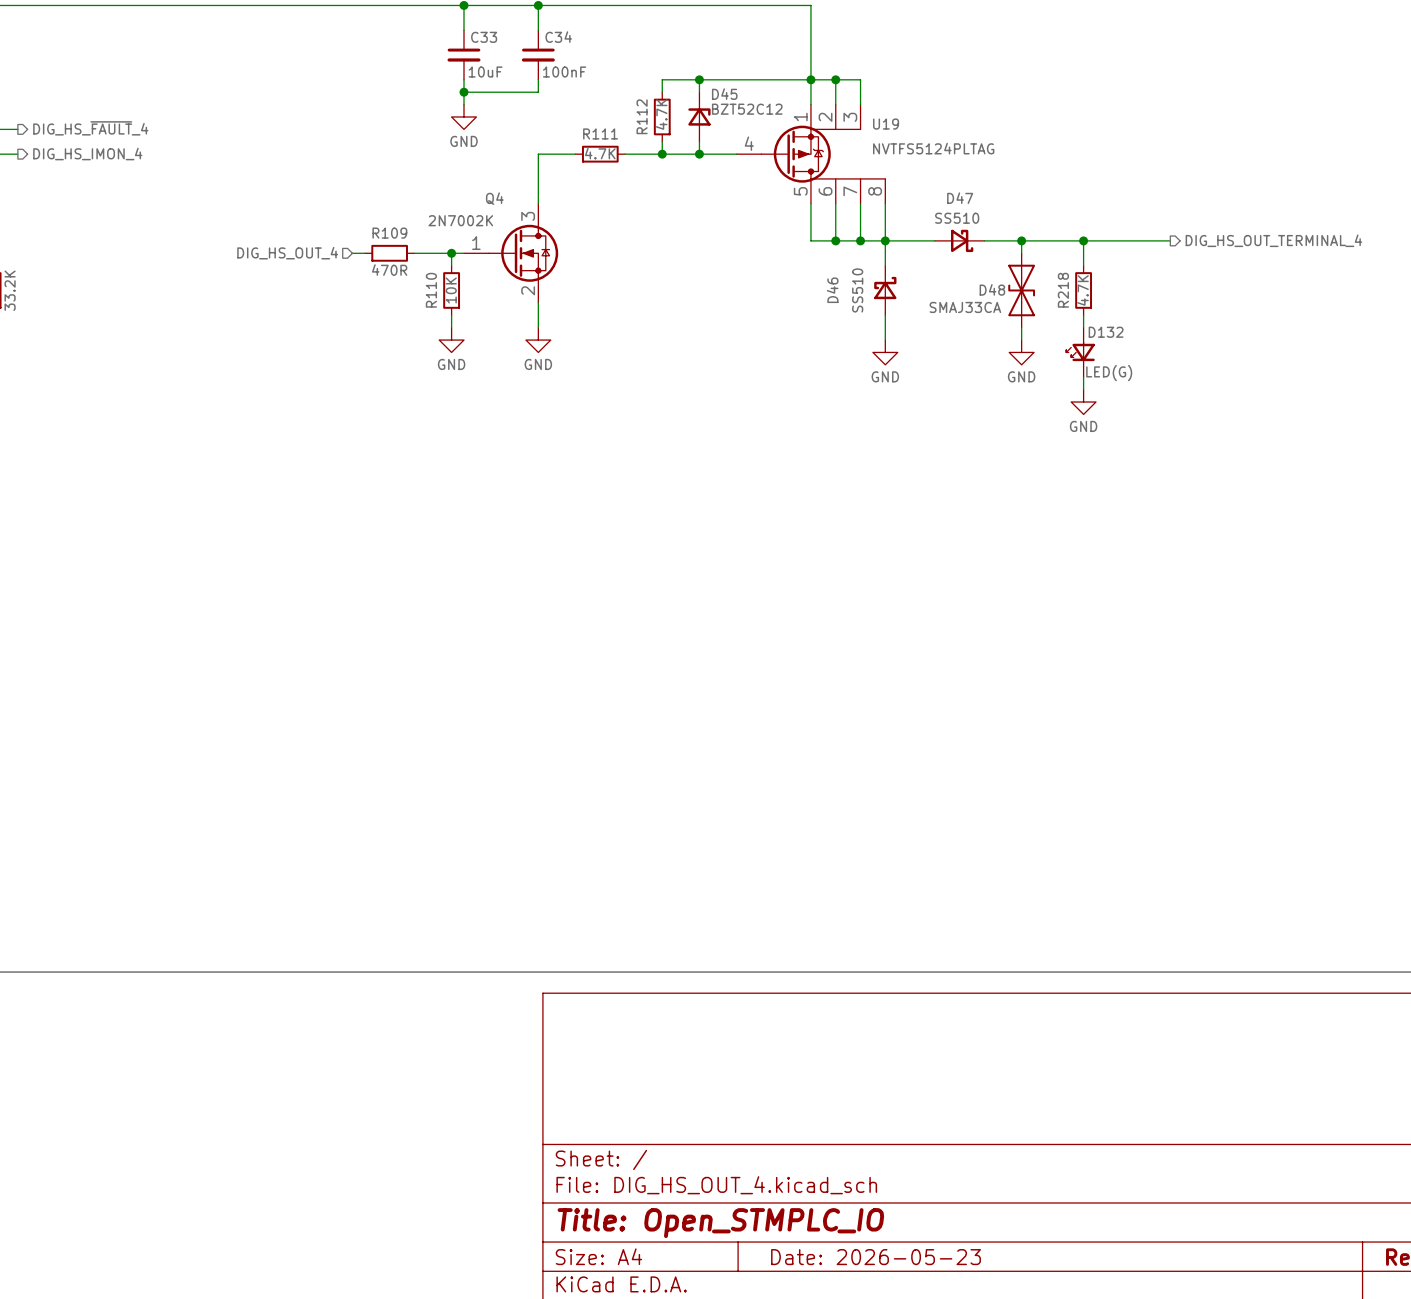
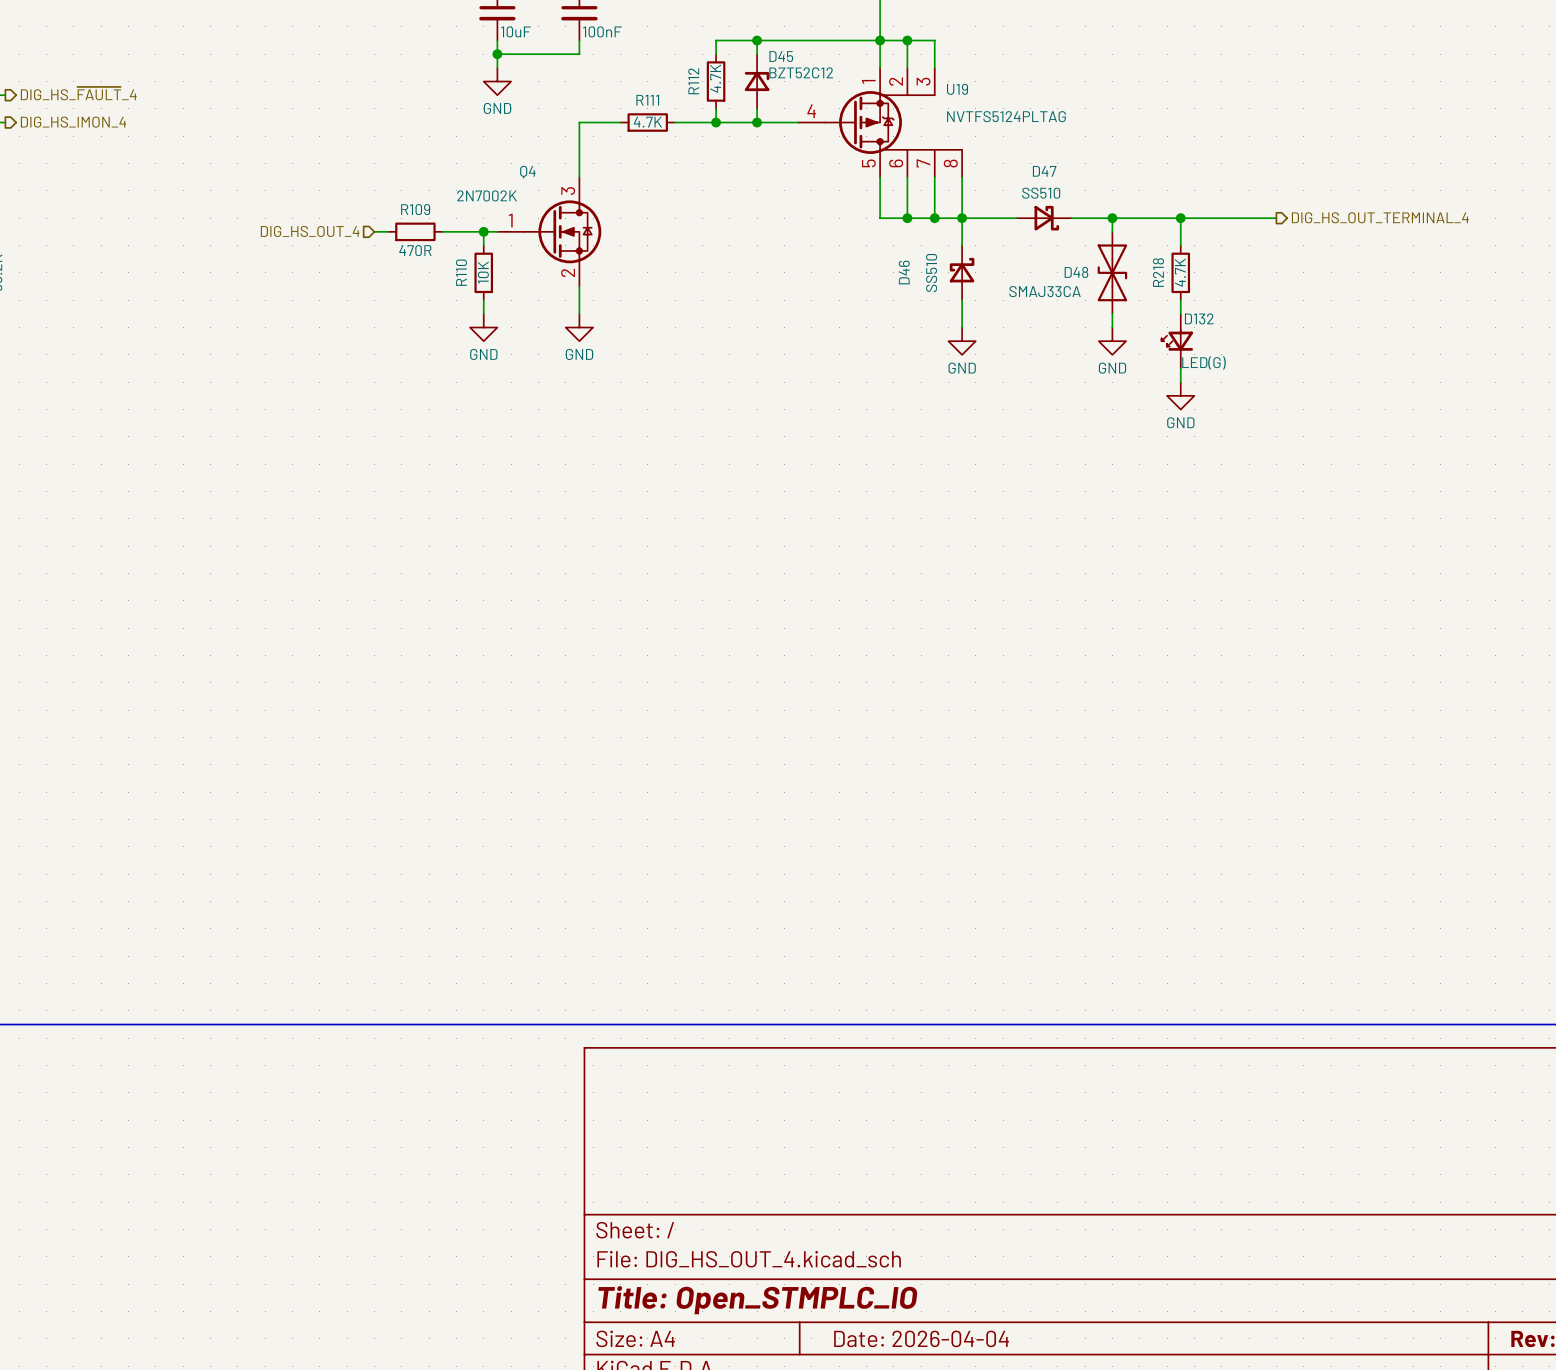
title block: Date: 2026-05-23 (876, 1257) -> Date: 2026-04-04 (921, 1338)

